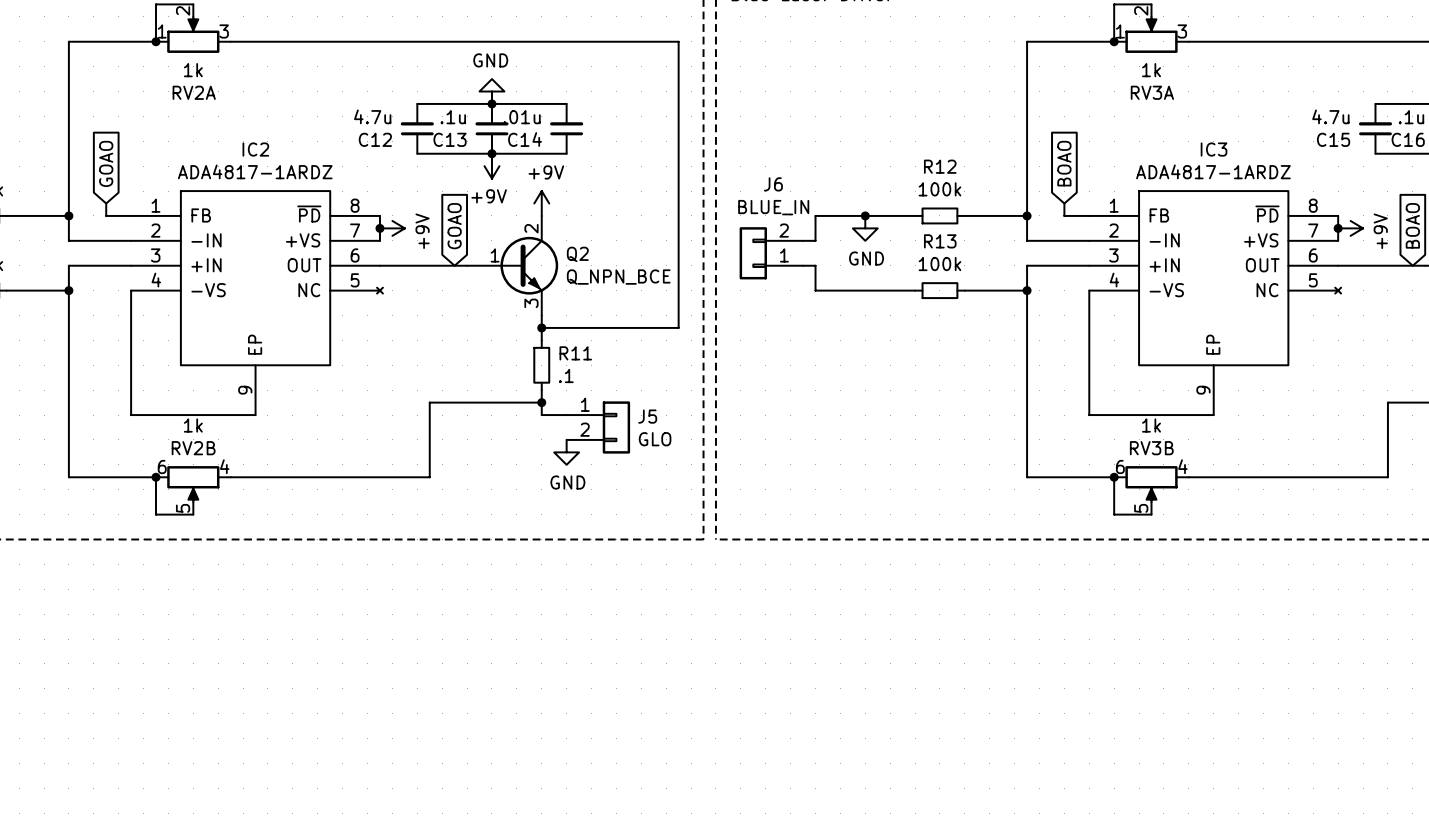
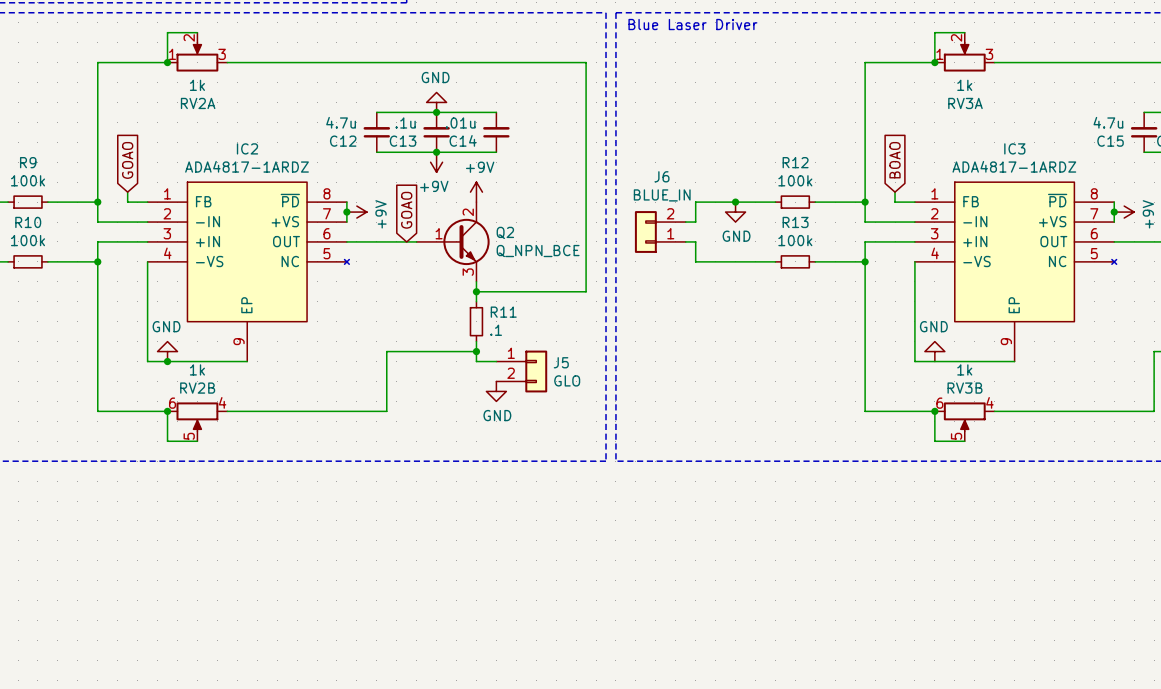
power symbol: none -> GND (167, 351)
power symbol: none -> GND (934, 351)
junction: none -> (167, 361)

